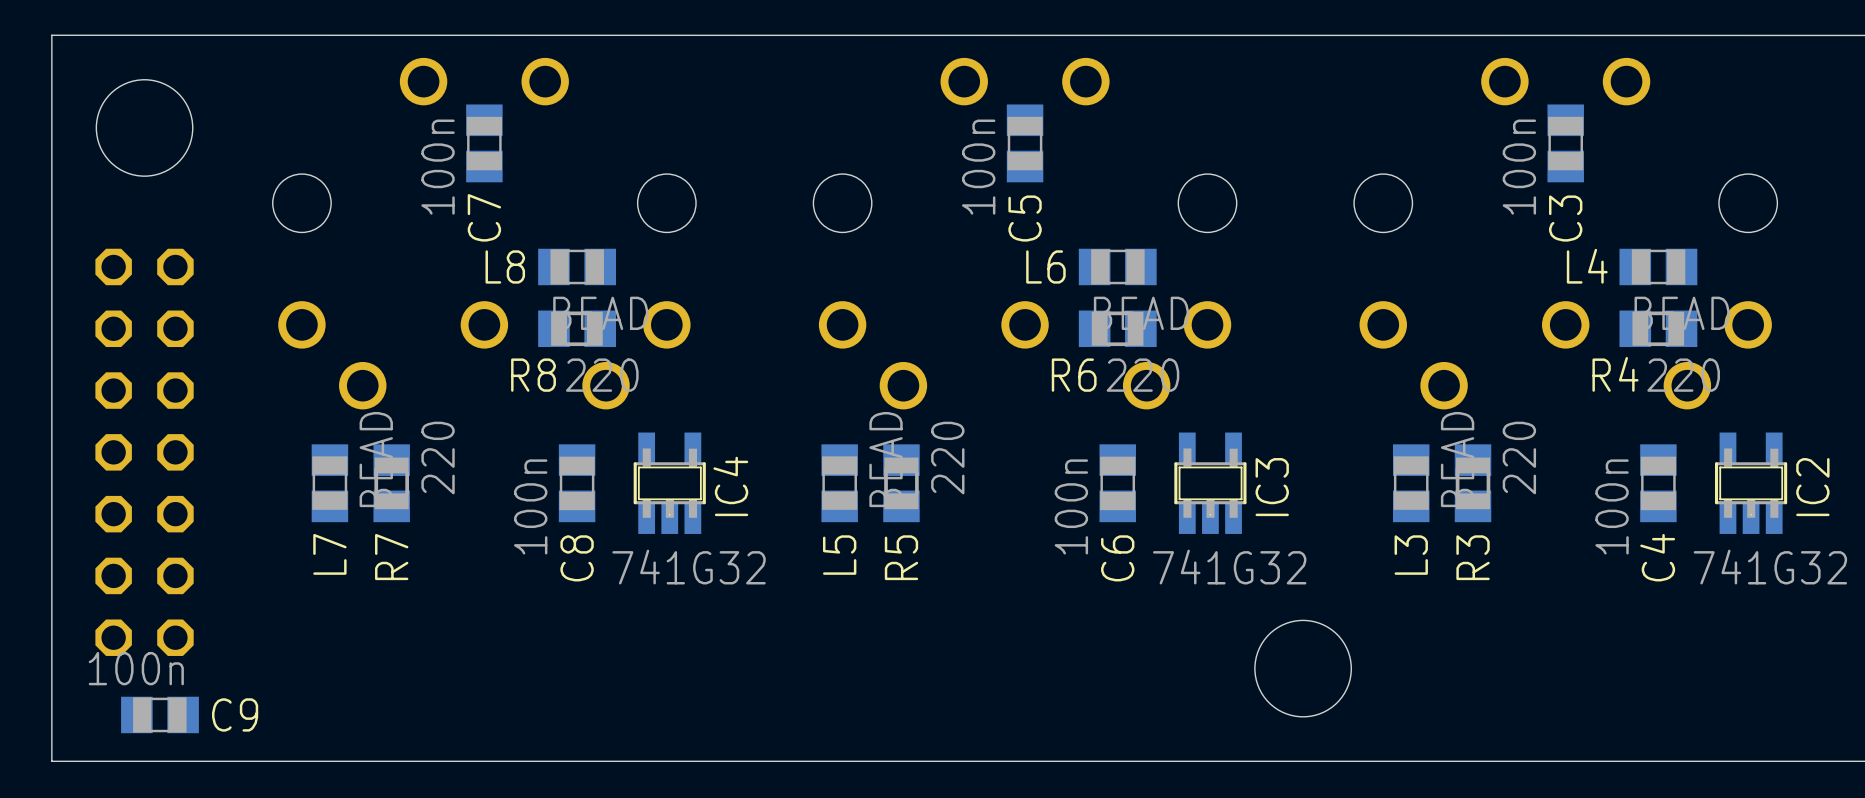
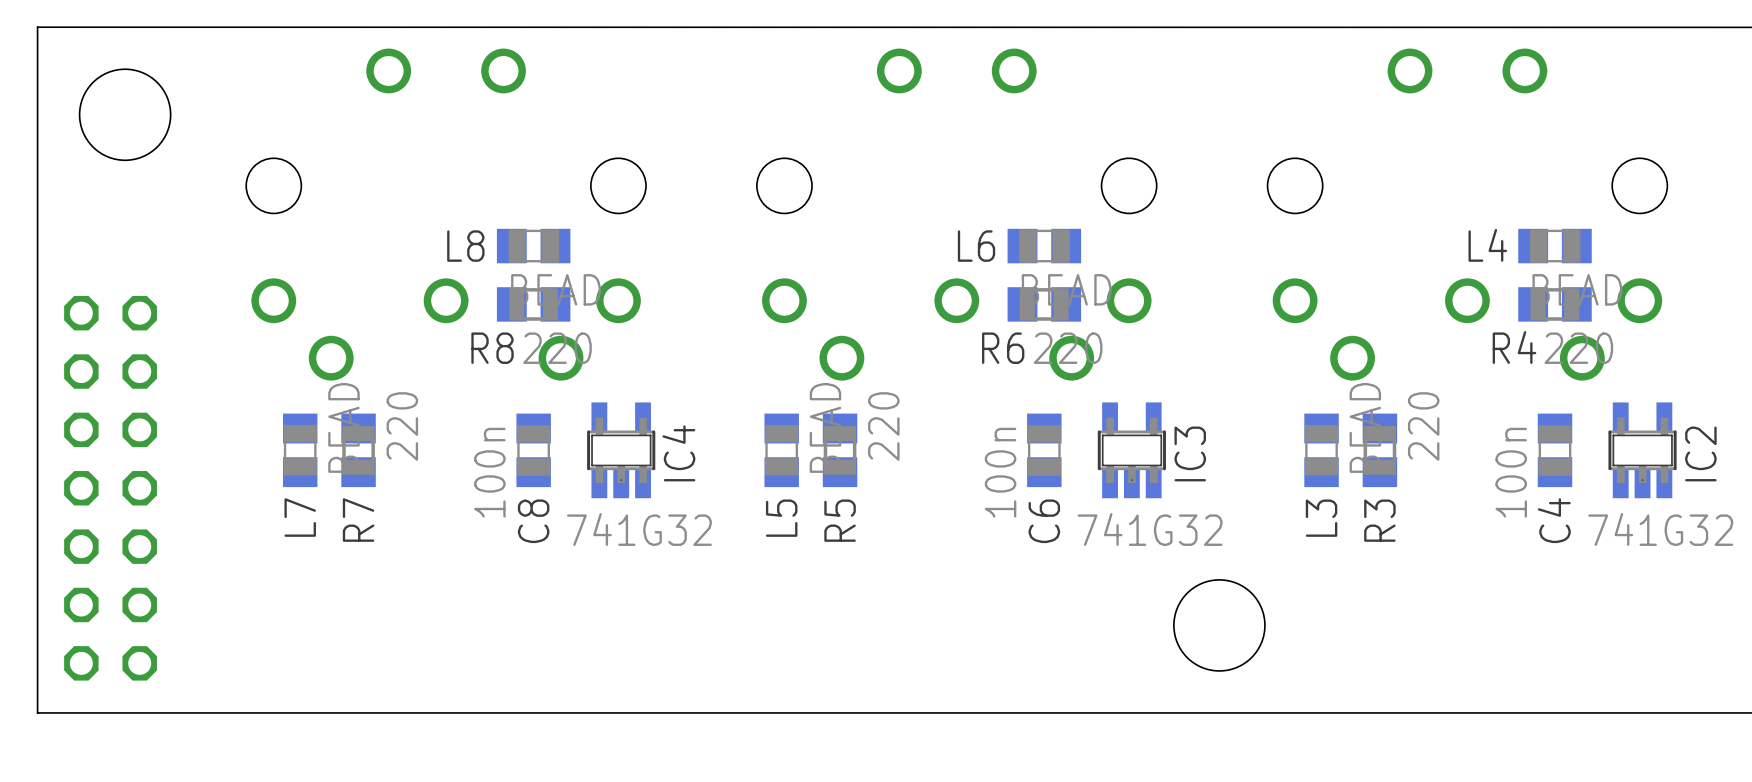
C7: 100n (484, 143) -> none
C5: 100n (1025, 143) -> none
C3: 100n (1565, 143) -> none
part position: (144, 452) -> (110, 488)
C9: 100n (159, 714) -> none

